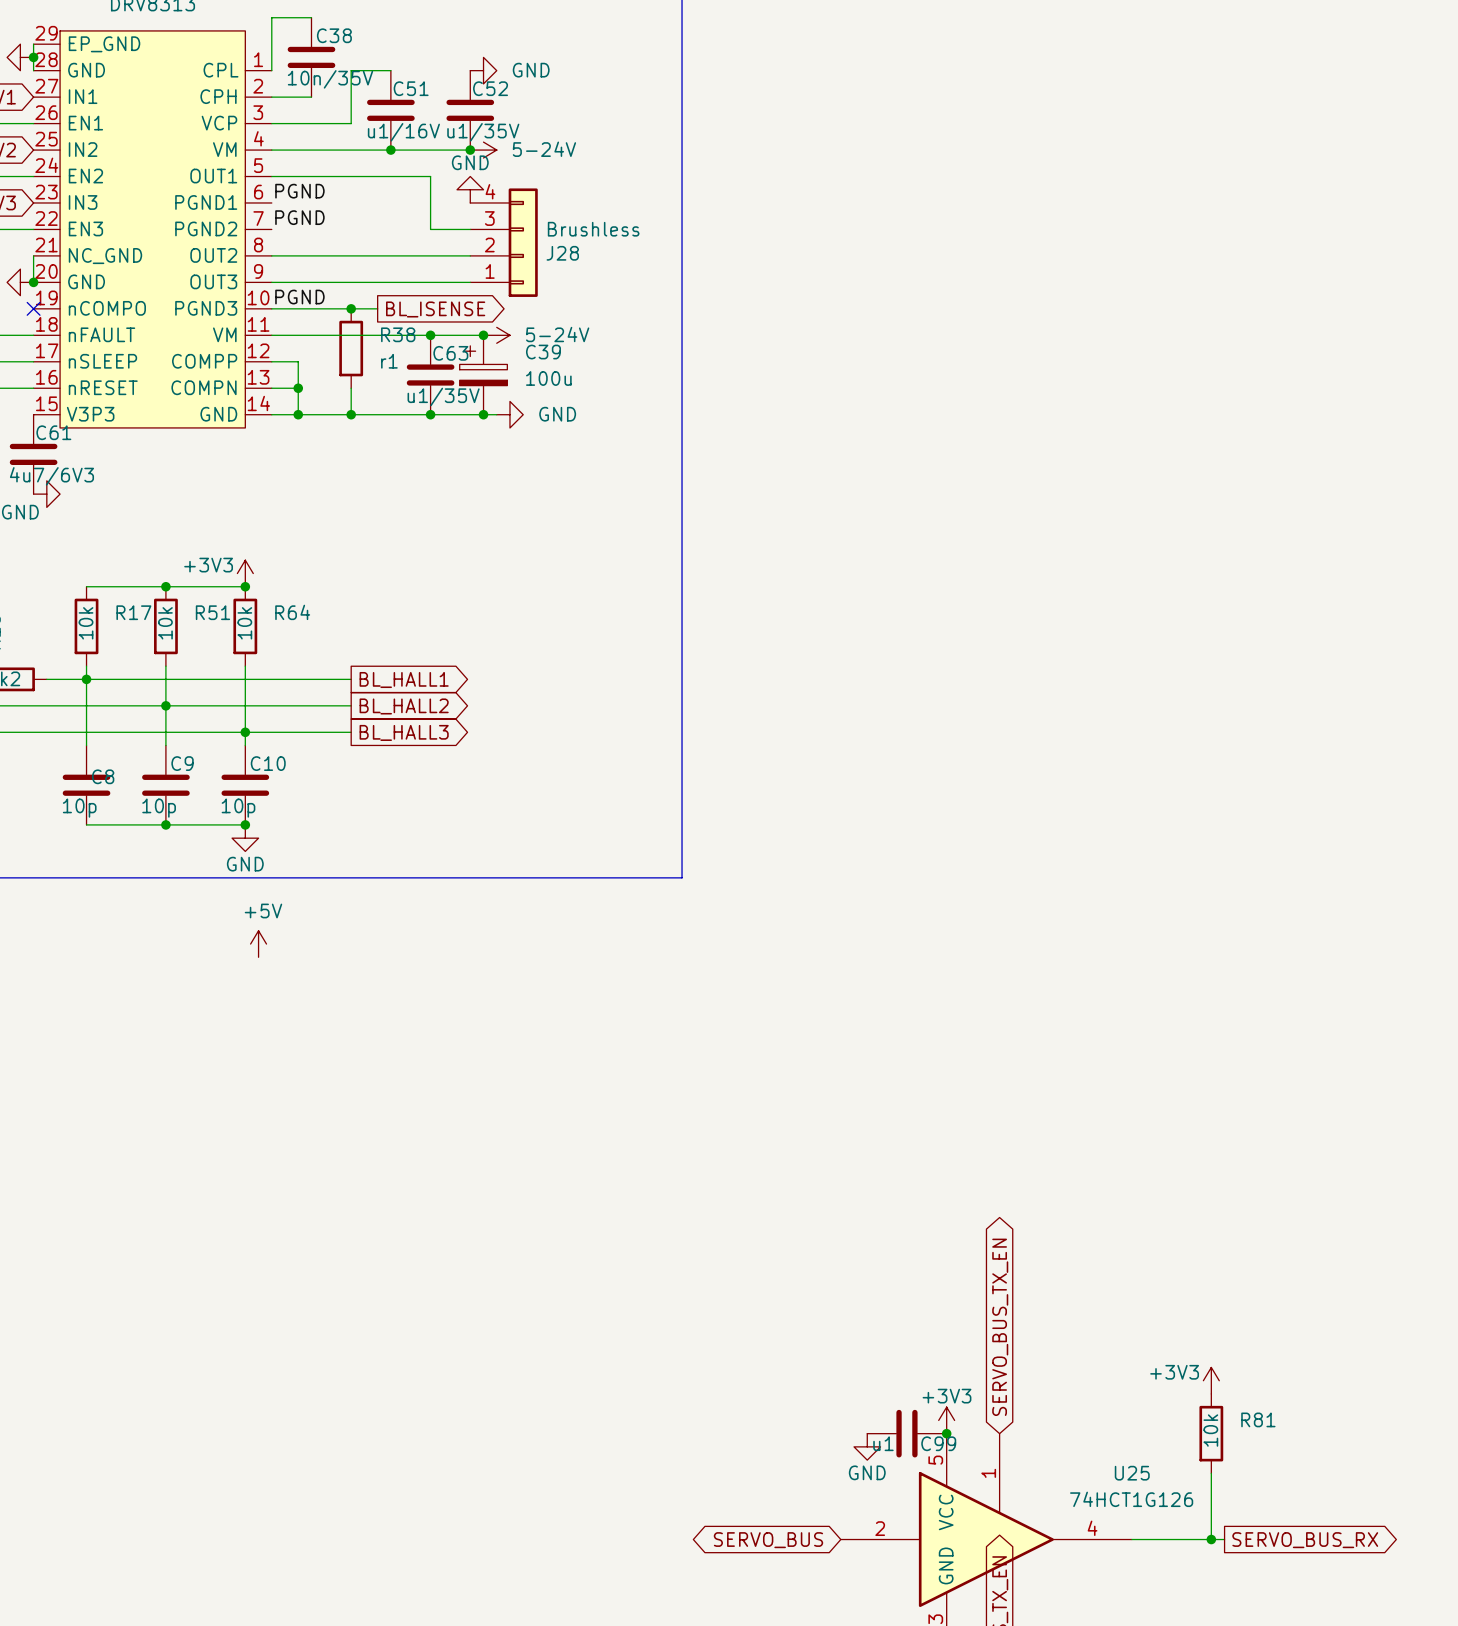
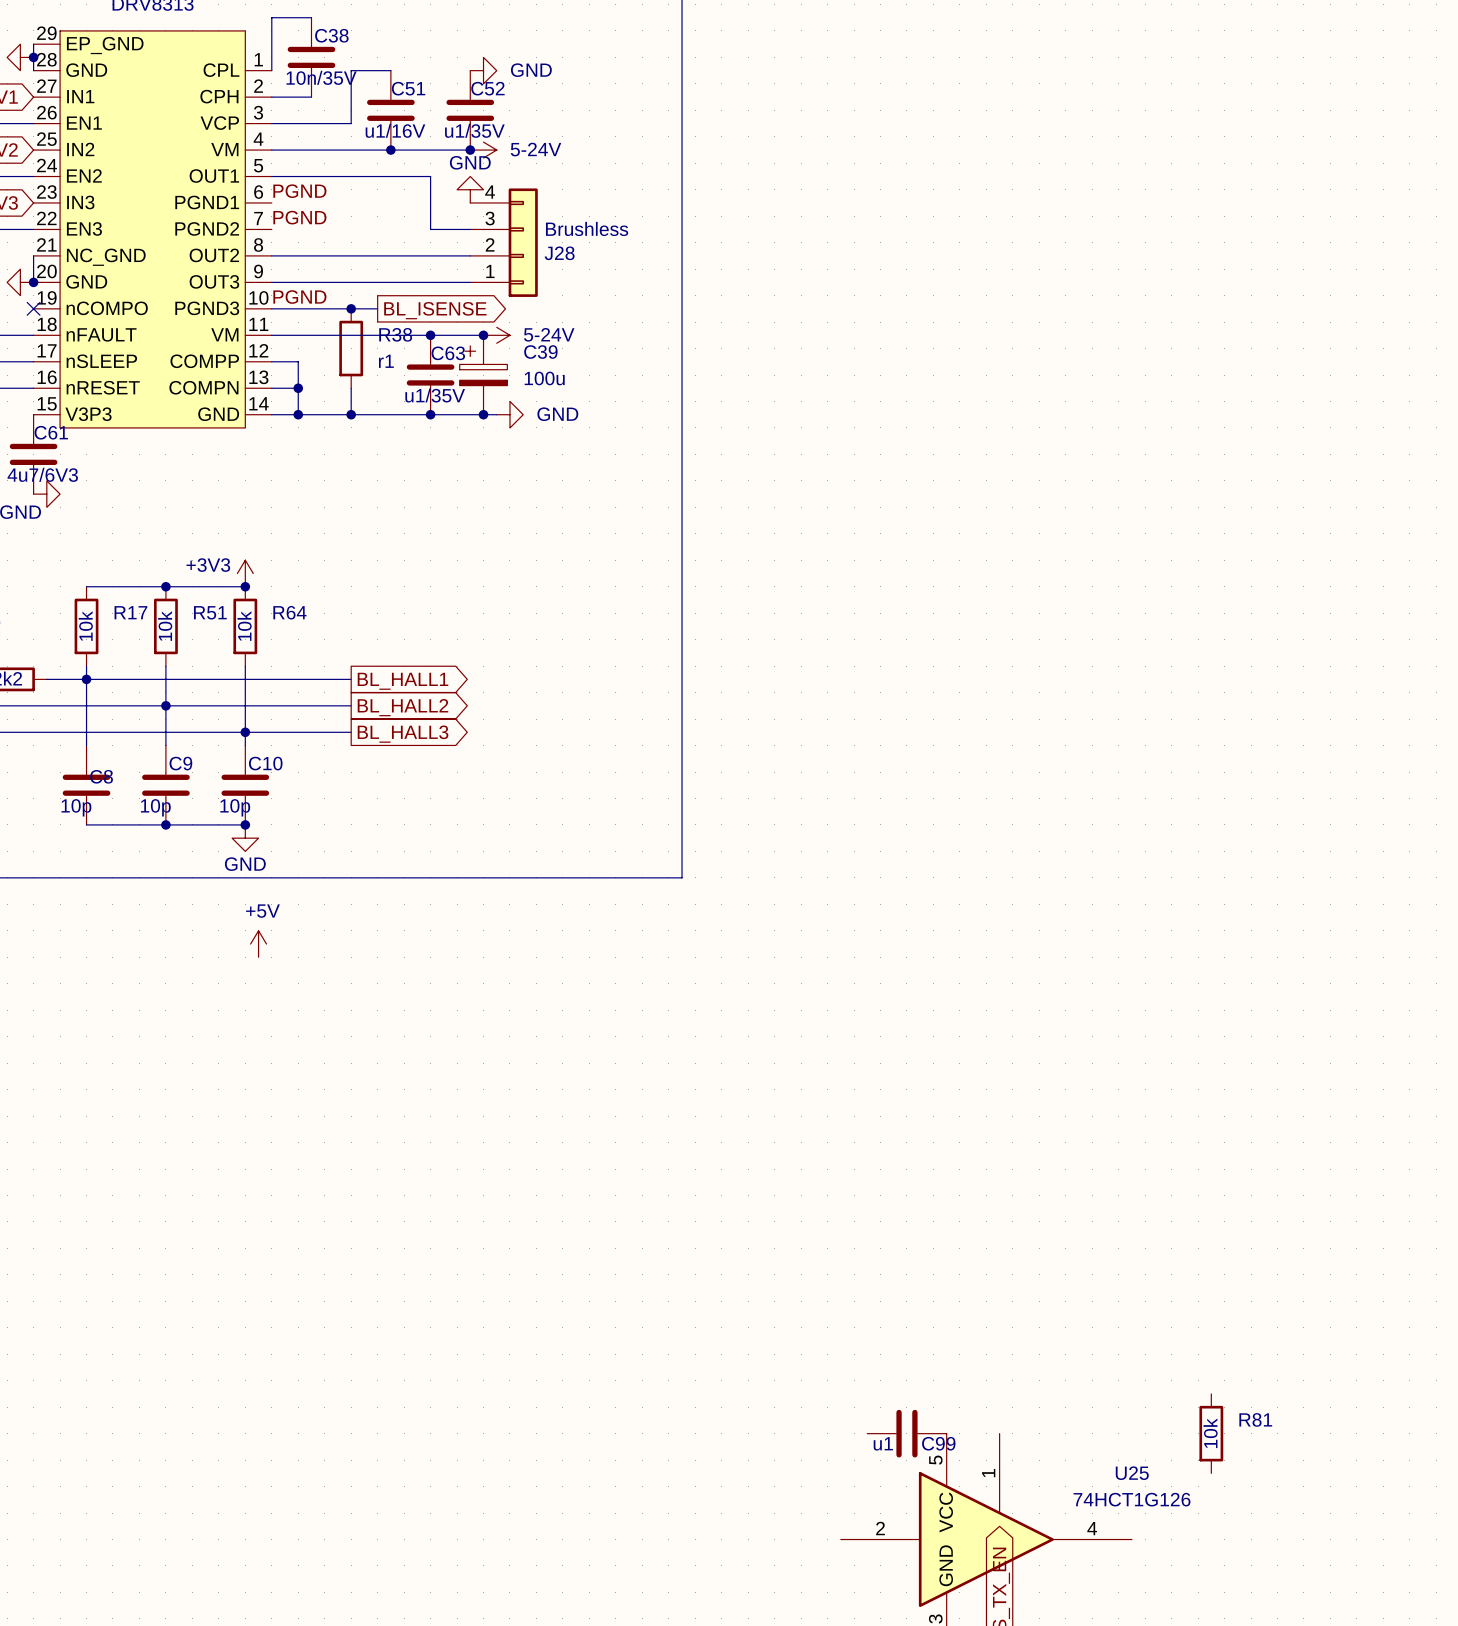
global label: SERVO_BUS_TX_EN (1000, 1327) -> none
power symbol: +3V3 (1211, 1380) -> none
power symbol: +3V3 (946, 1420) -> none
junction: (946, 1433) -> none
power symbol: GND (867, 1446) -> none
wire: (1211, 1473) (1211, 1539) -> none
wire: (1131, 1539) (1224, 1539) -> none
junction: (1211, 1539) -> none
global label: SERVO_BUS (768, 1540) -> none
global label: SERVO_BUS_RX (1305, 1540) -> none

